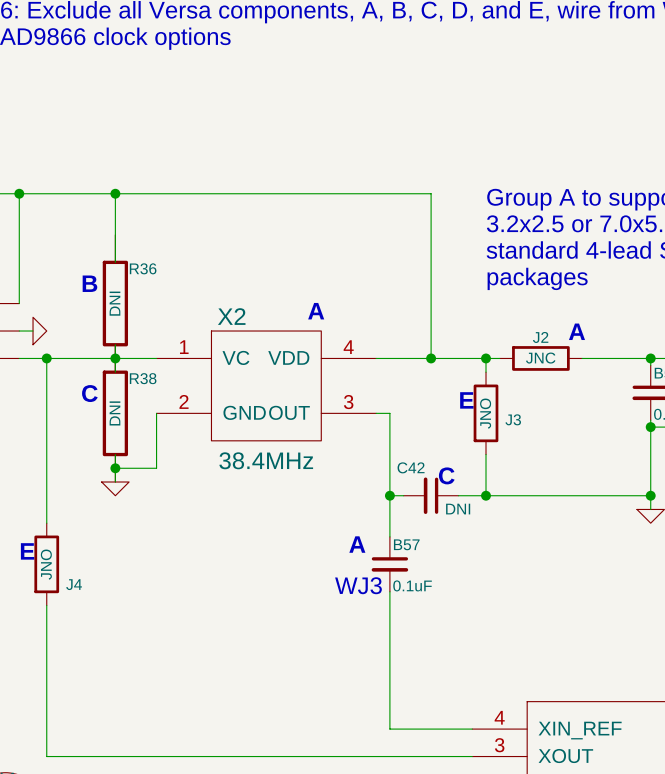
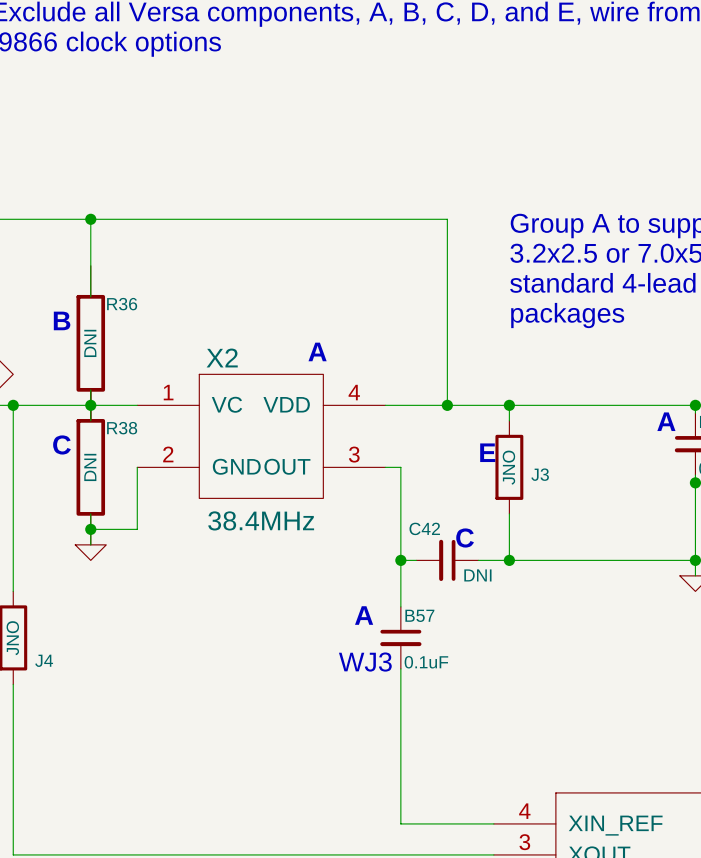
text position: A (576, 331) -> A (666, 421)
wire: none -> (524, 405) (617, 405)
J2: JNC (540, 358) -> none

